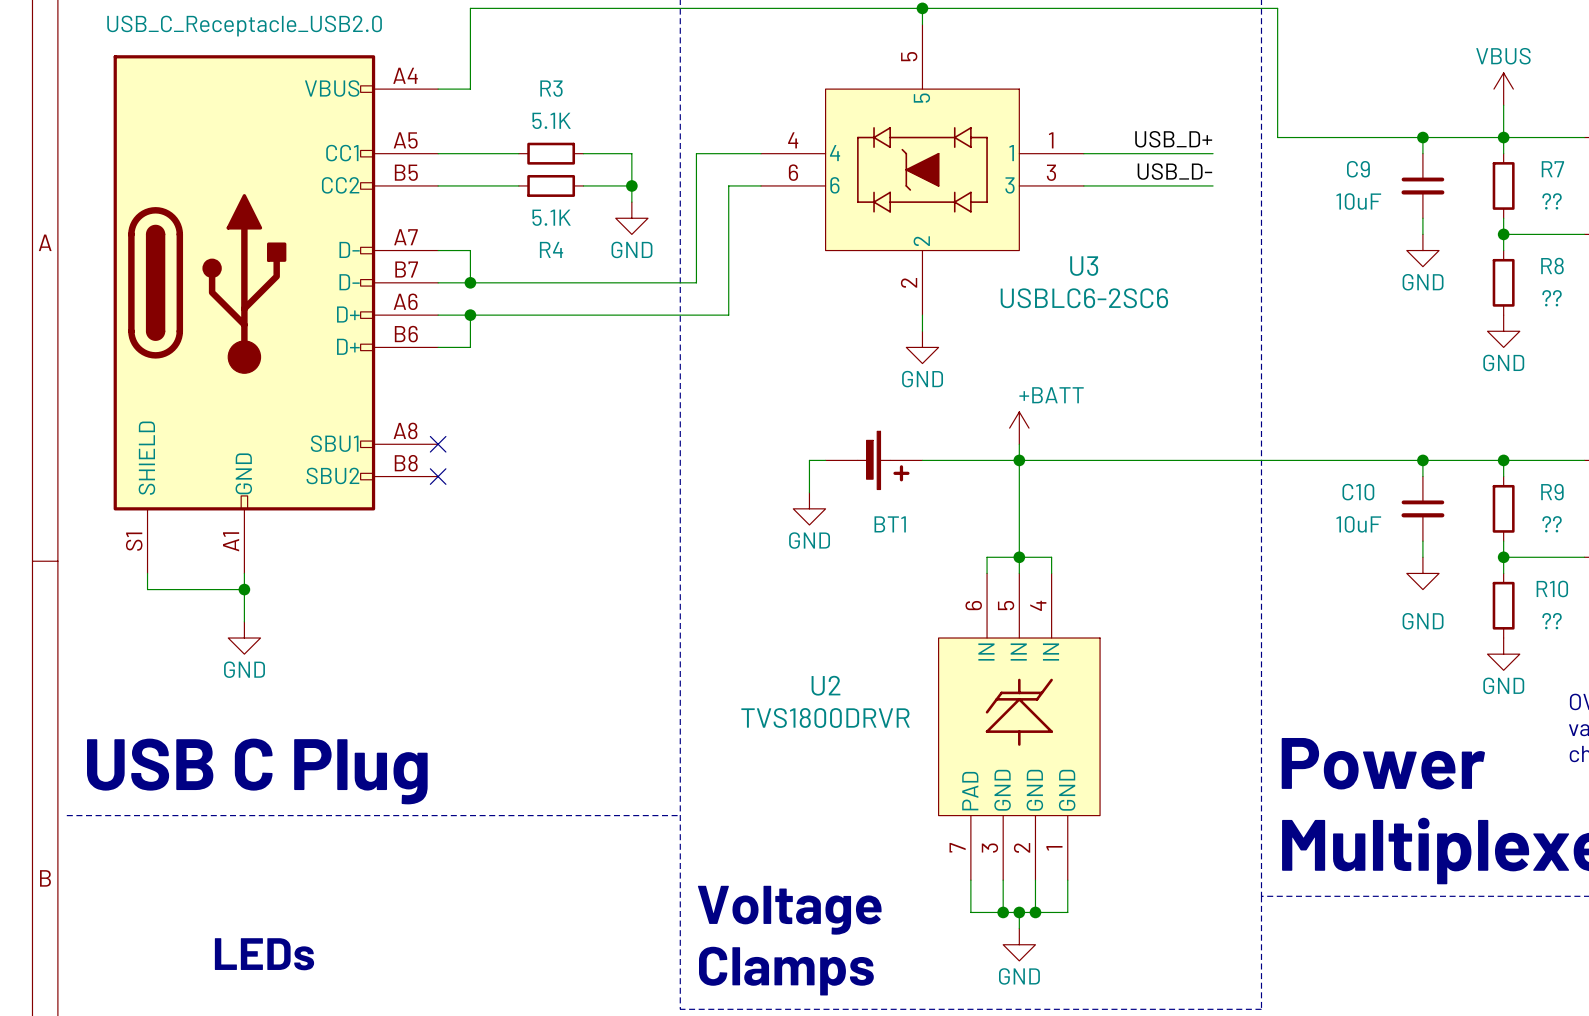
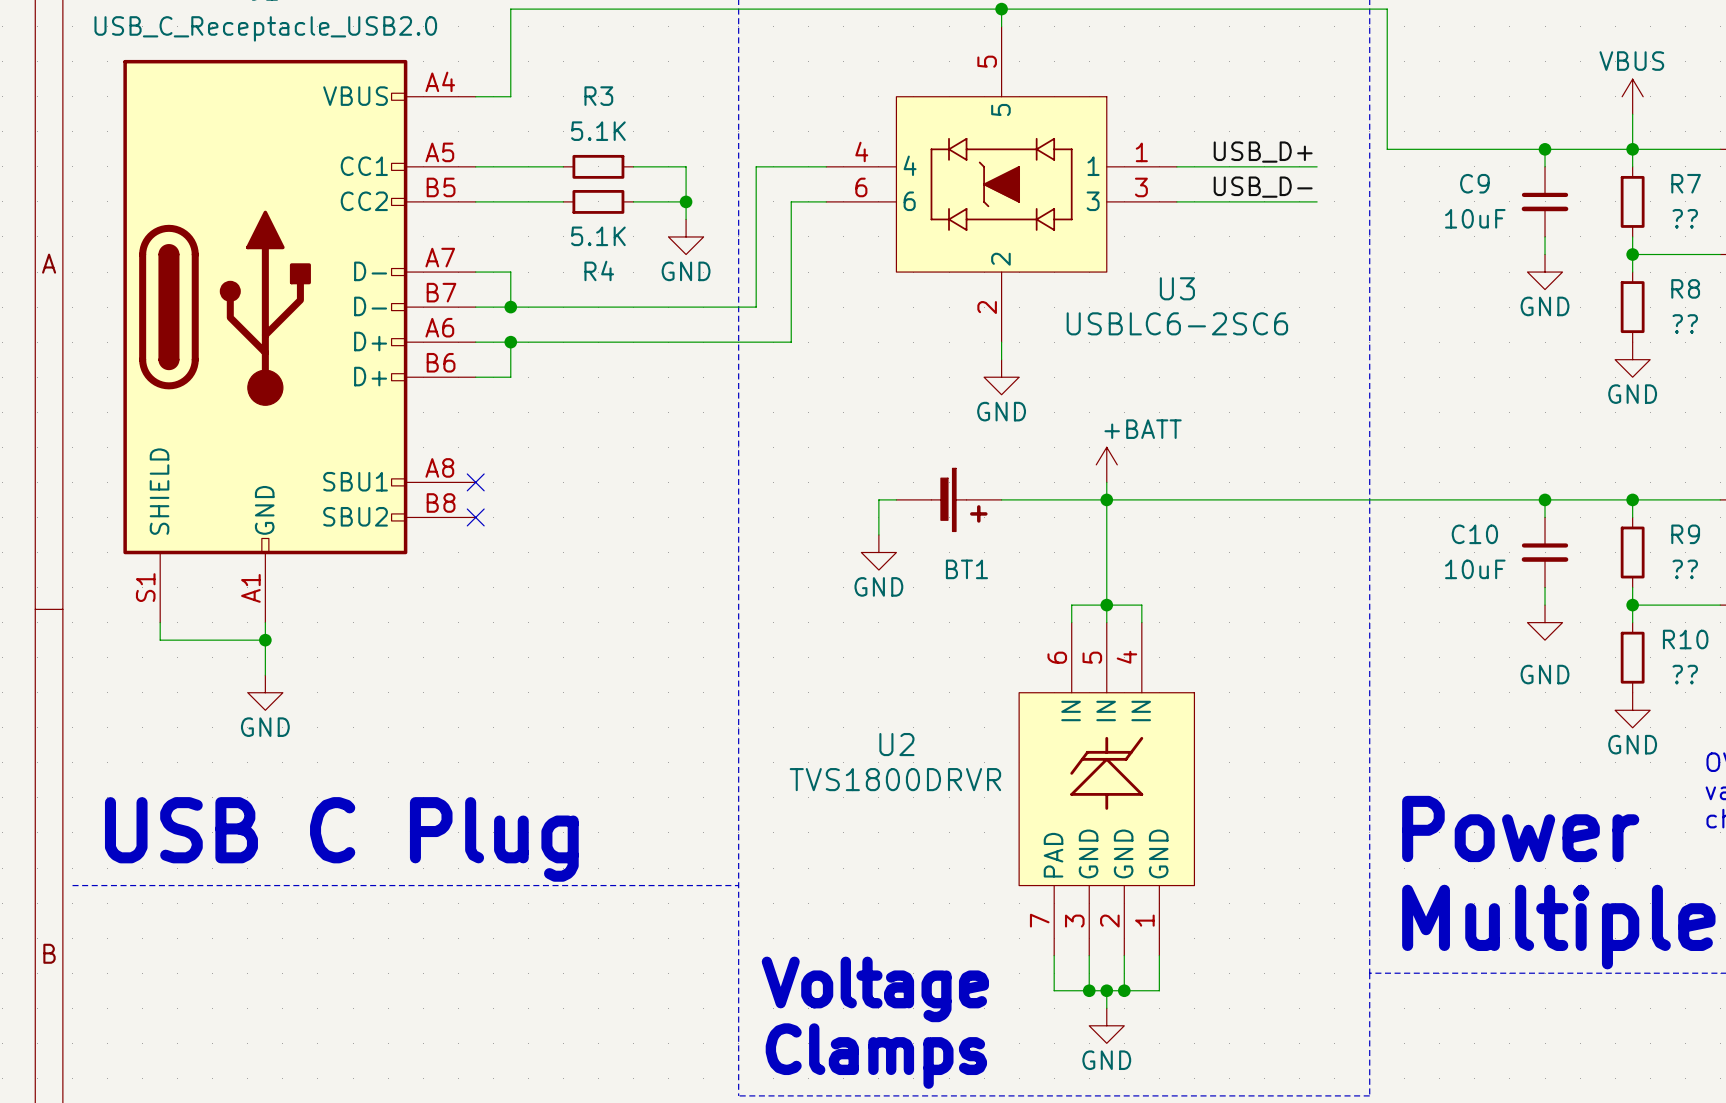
text: LEDs (264, 954) -> none

